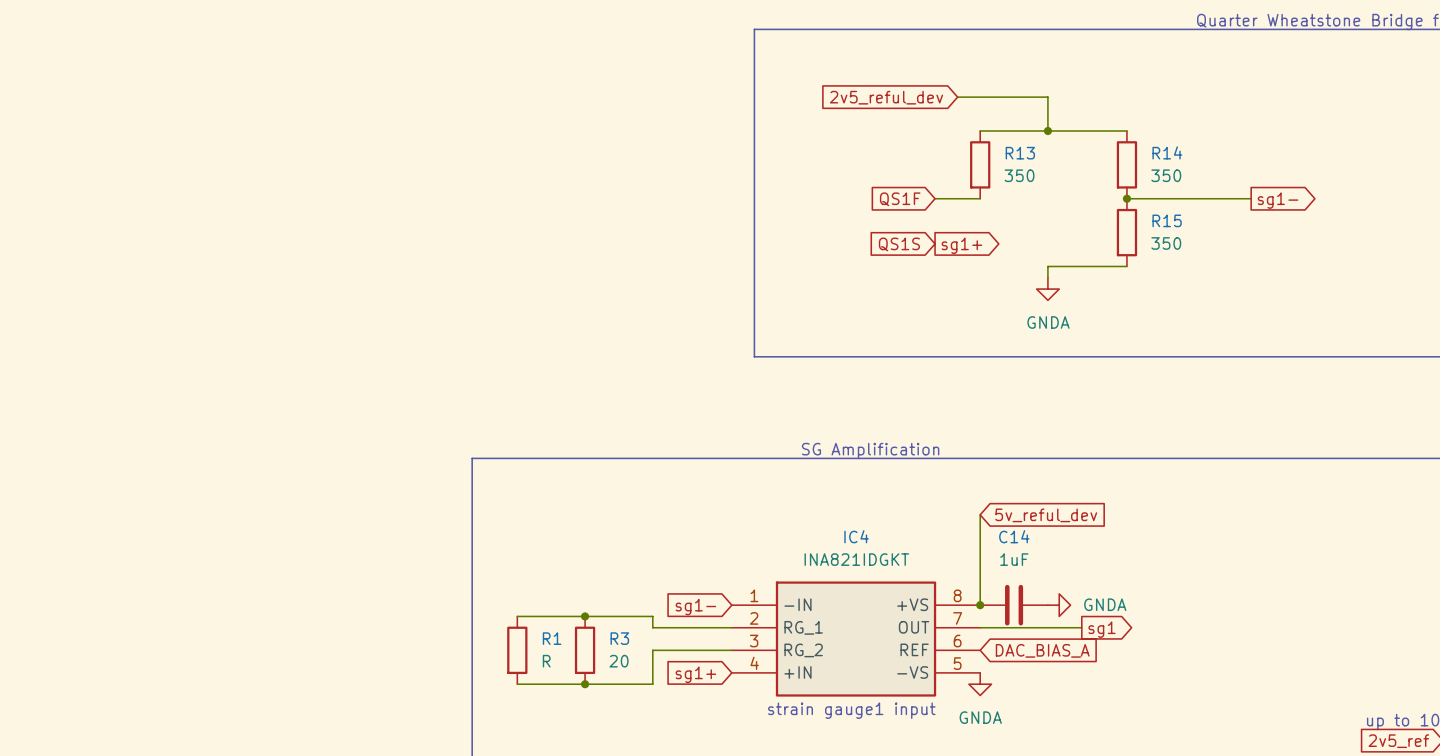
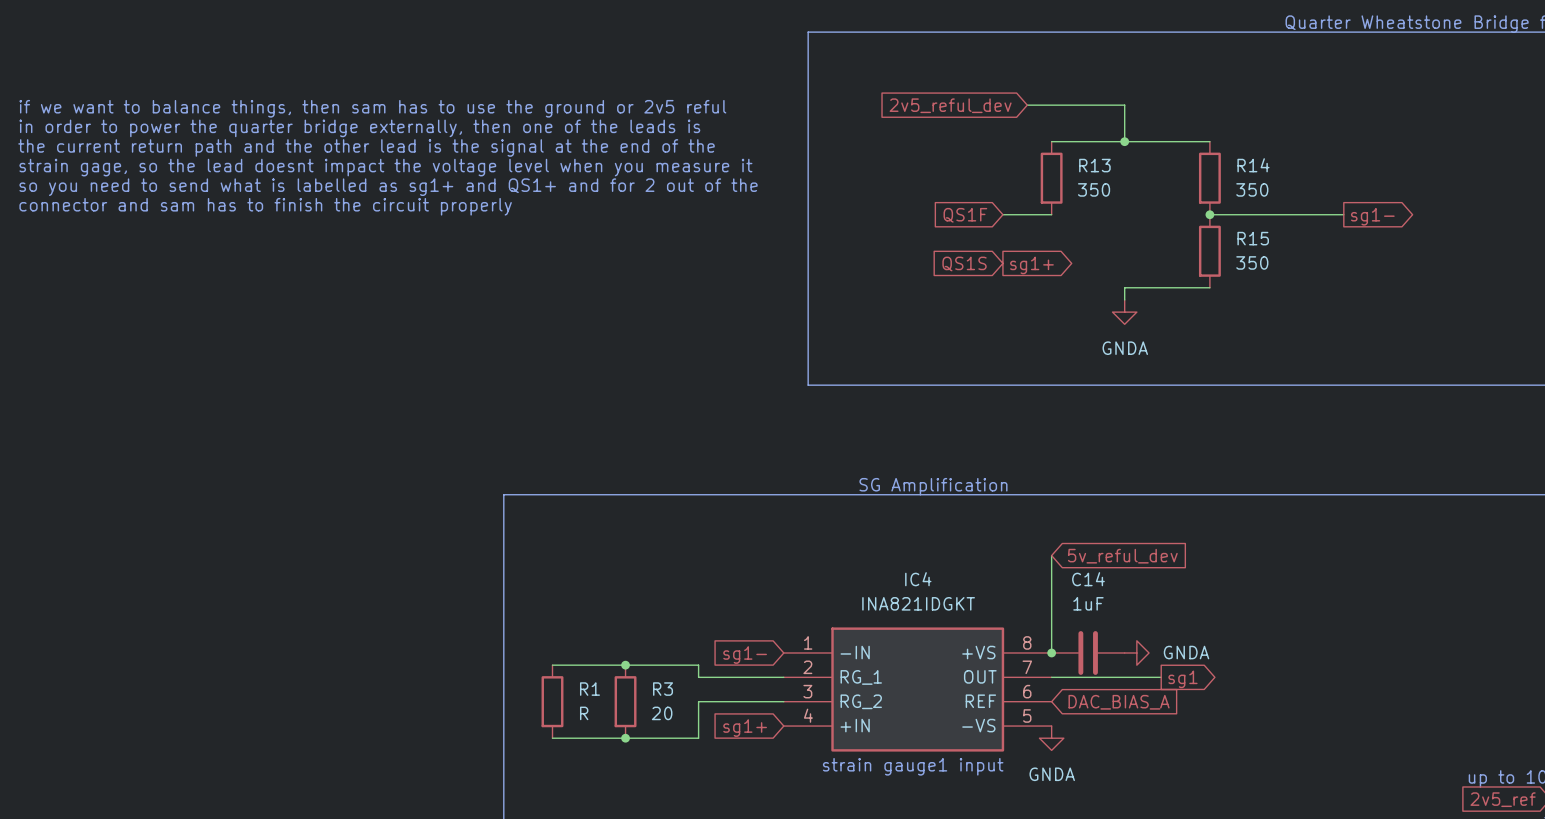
text: none -> if we want to balance things, then sam has to use the ground or 2v5 reful (372, 108)
text: none -> in order to power the quarter bridge externally, then one of the leads is (359, 128)
text: none -> the current return path and the other lead is the signal at the end of the (366, 147)
text: none -> strain gage, so the lead doesnt impact the voltage level when you measure it (385, 167)
text: none -> so you need to send what is labelled as sg1+ and QS1+ and for 2 out of the (388, 187)
text: none -> connector and sam has to finish the circuit properly (265, 206)

